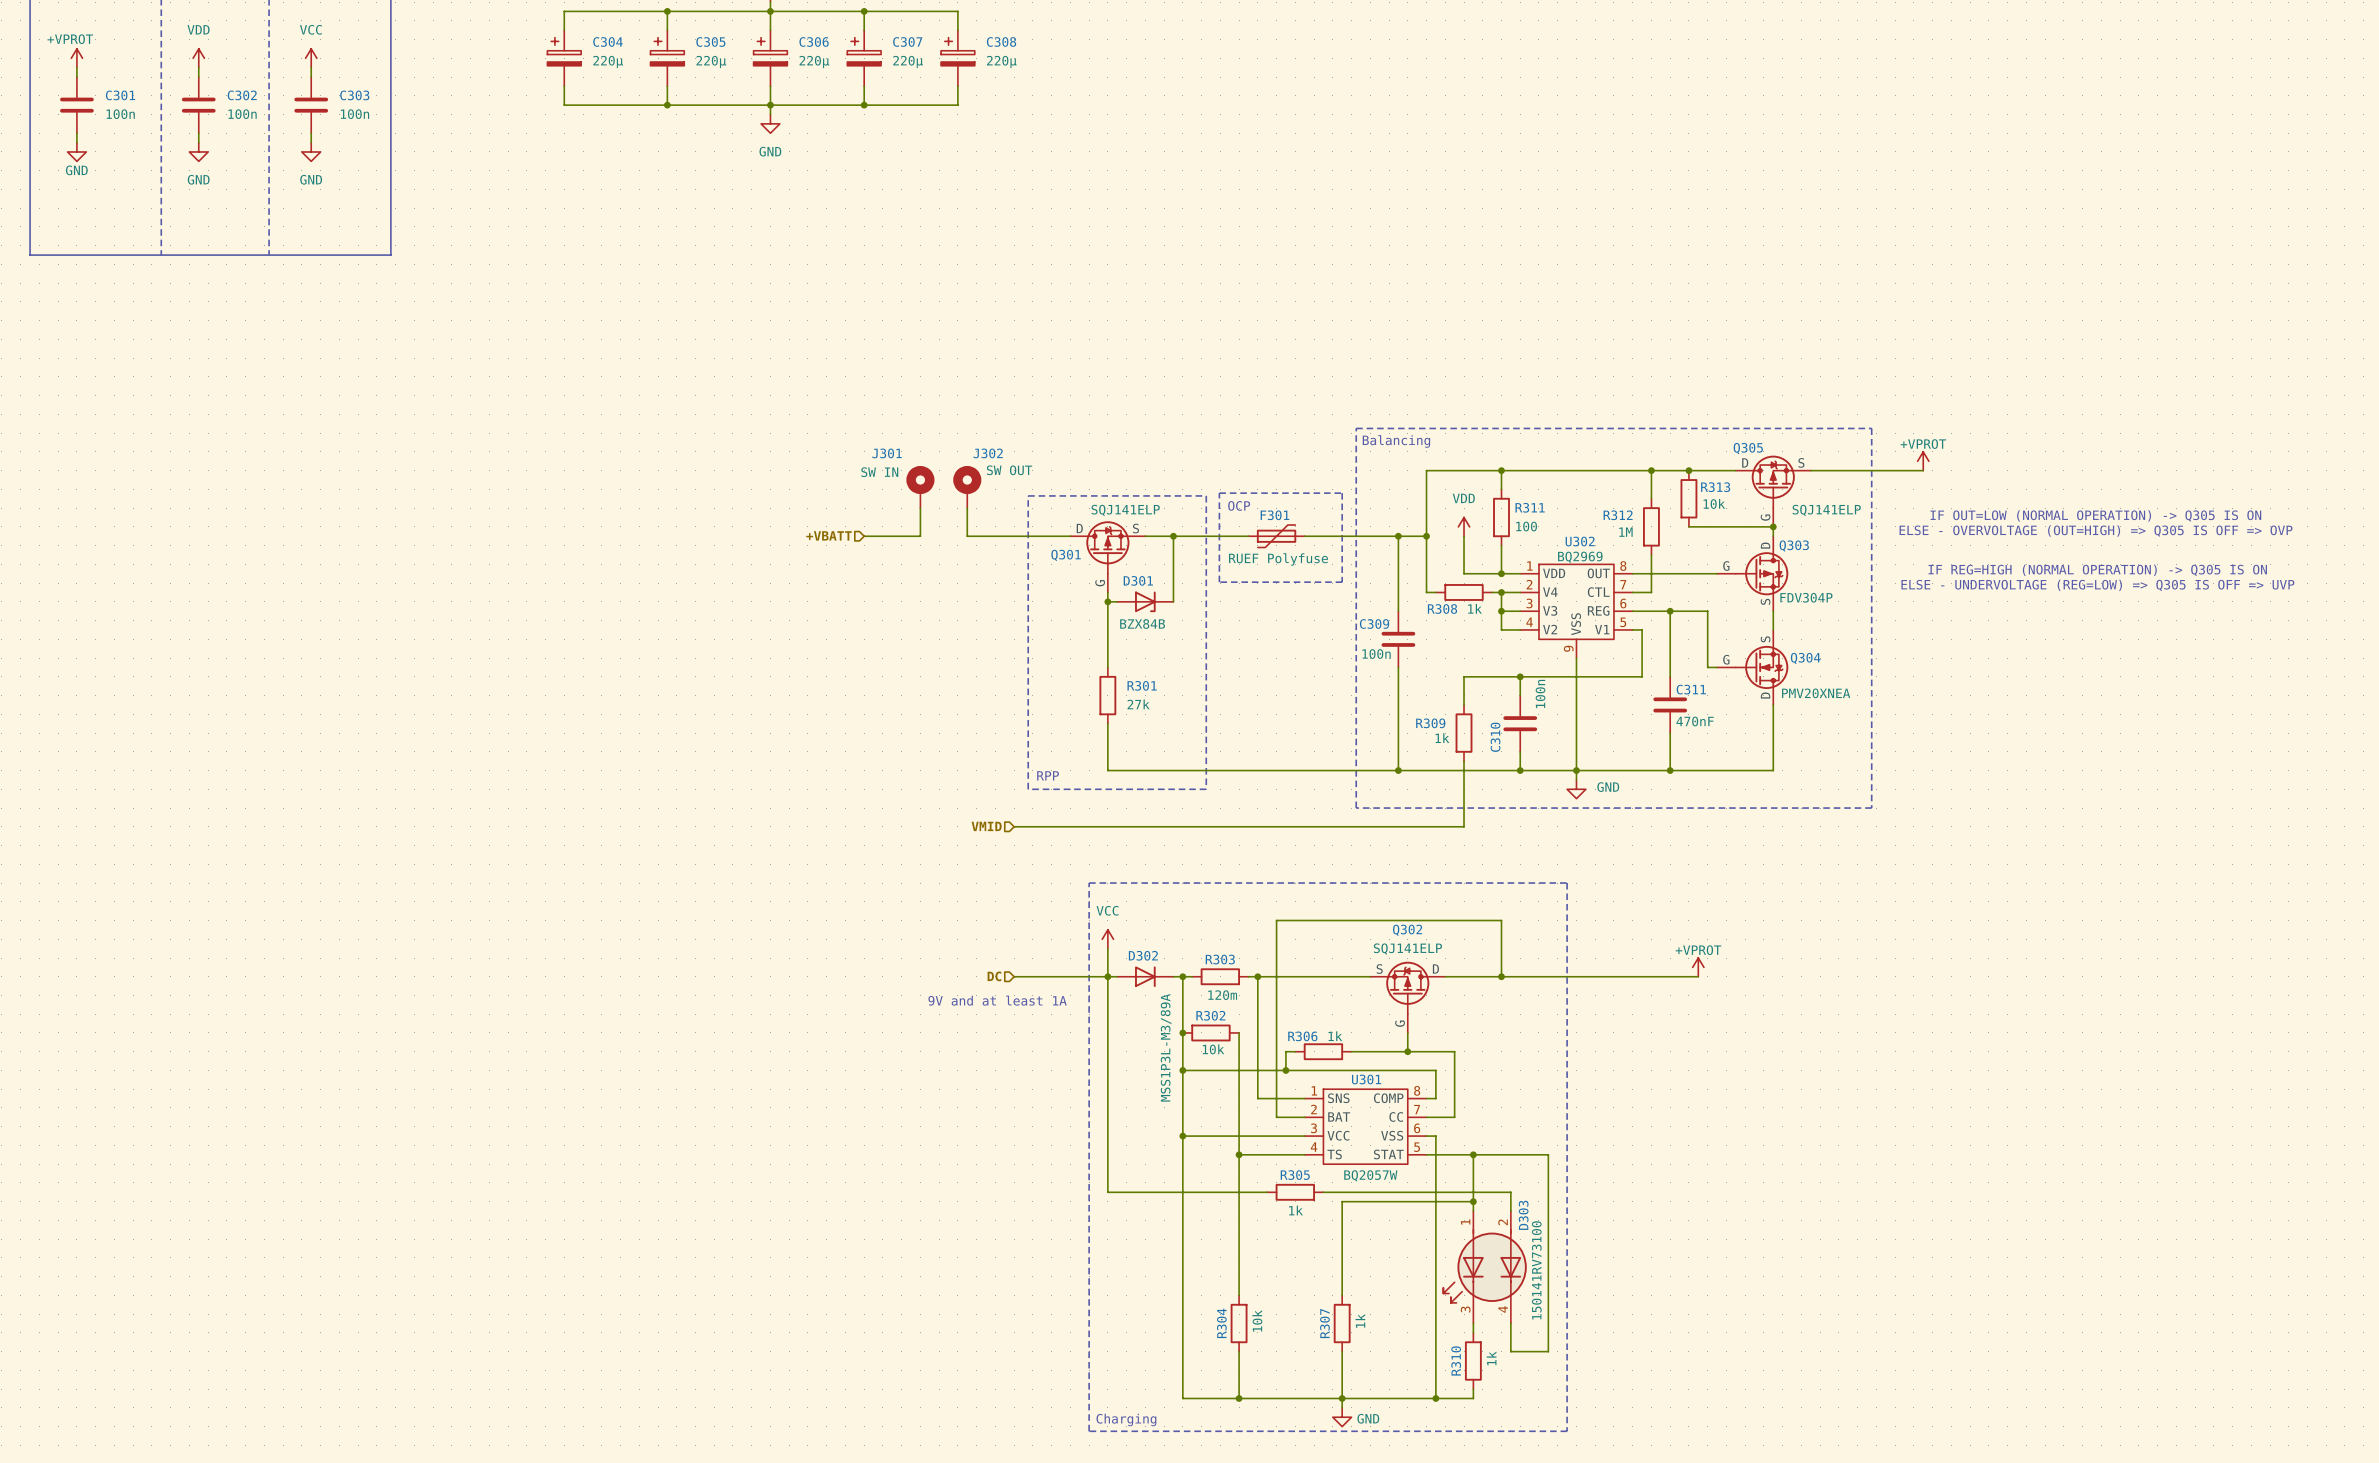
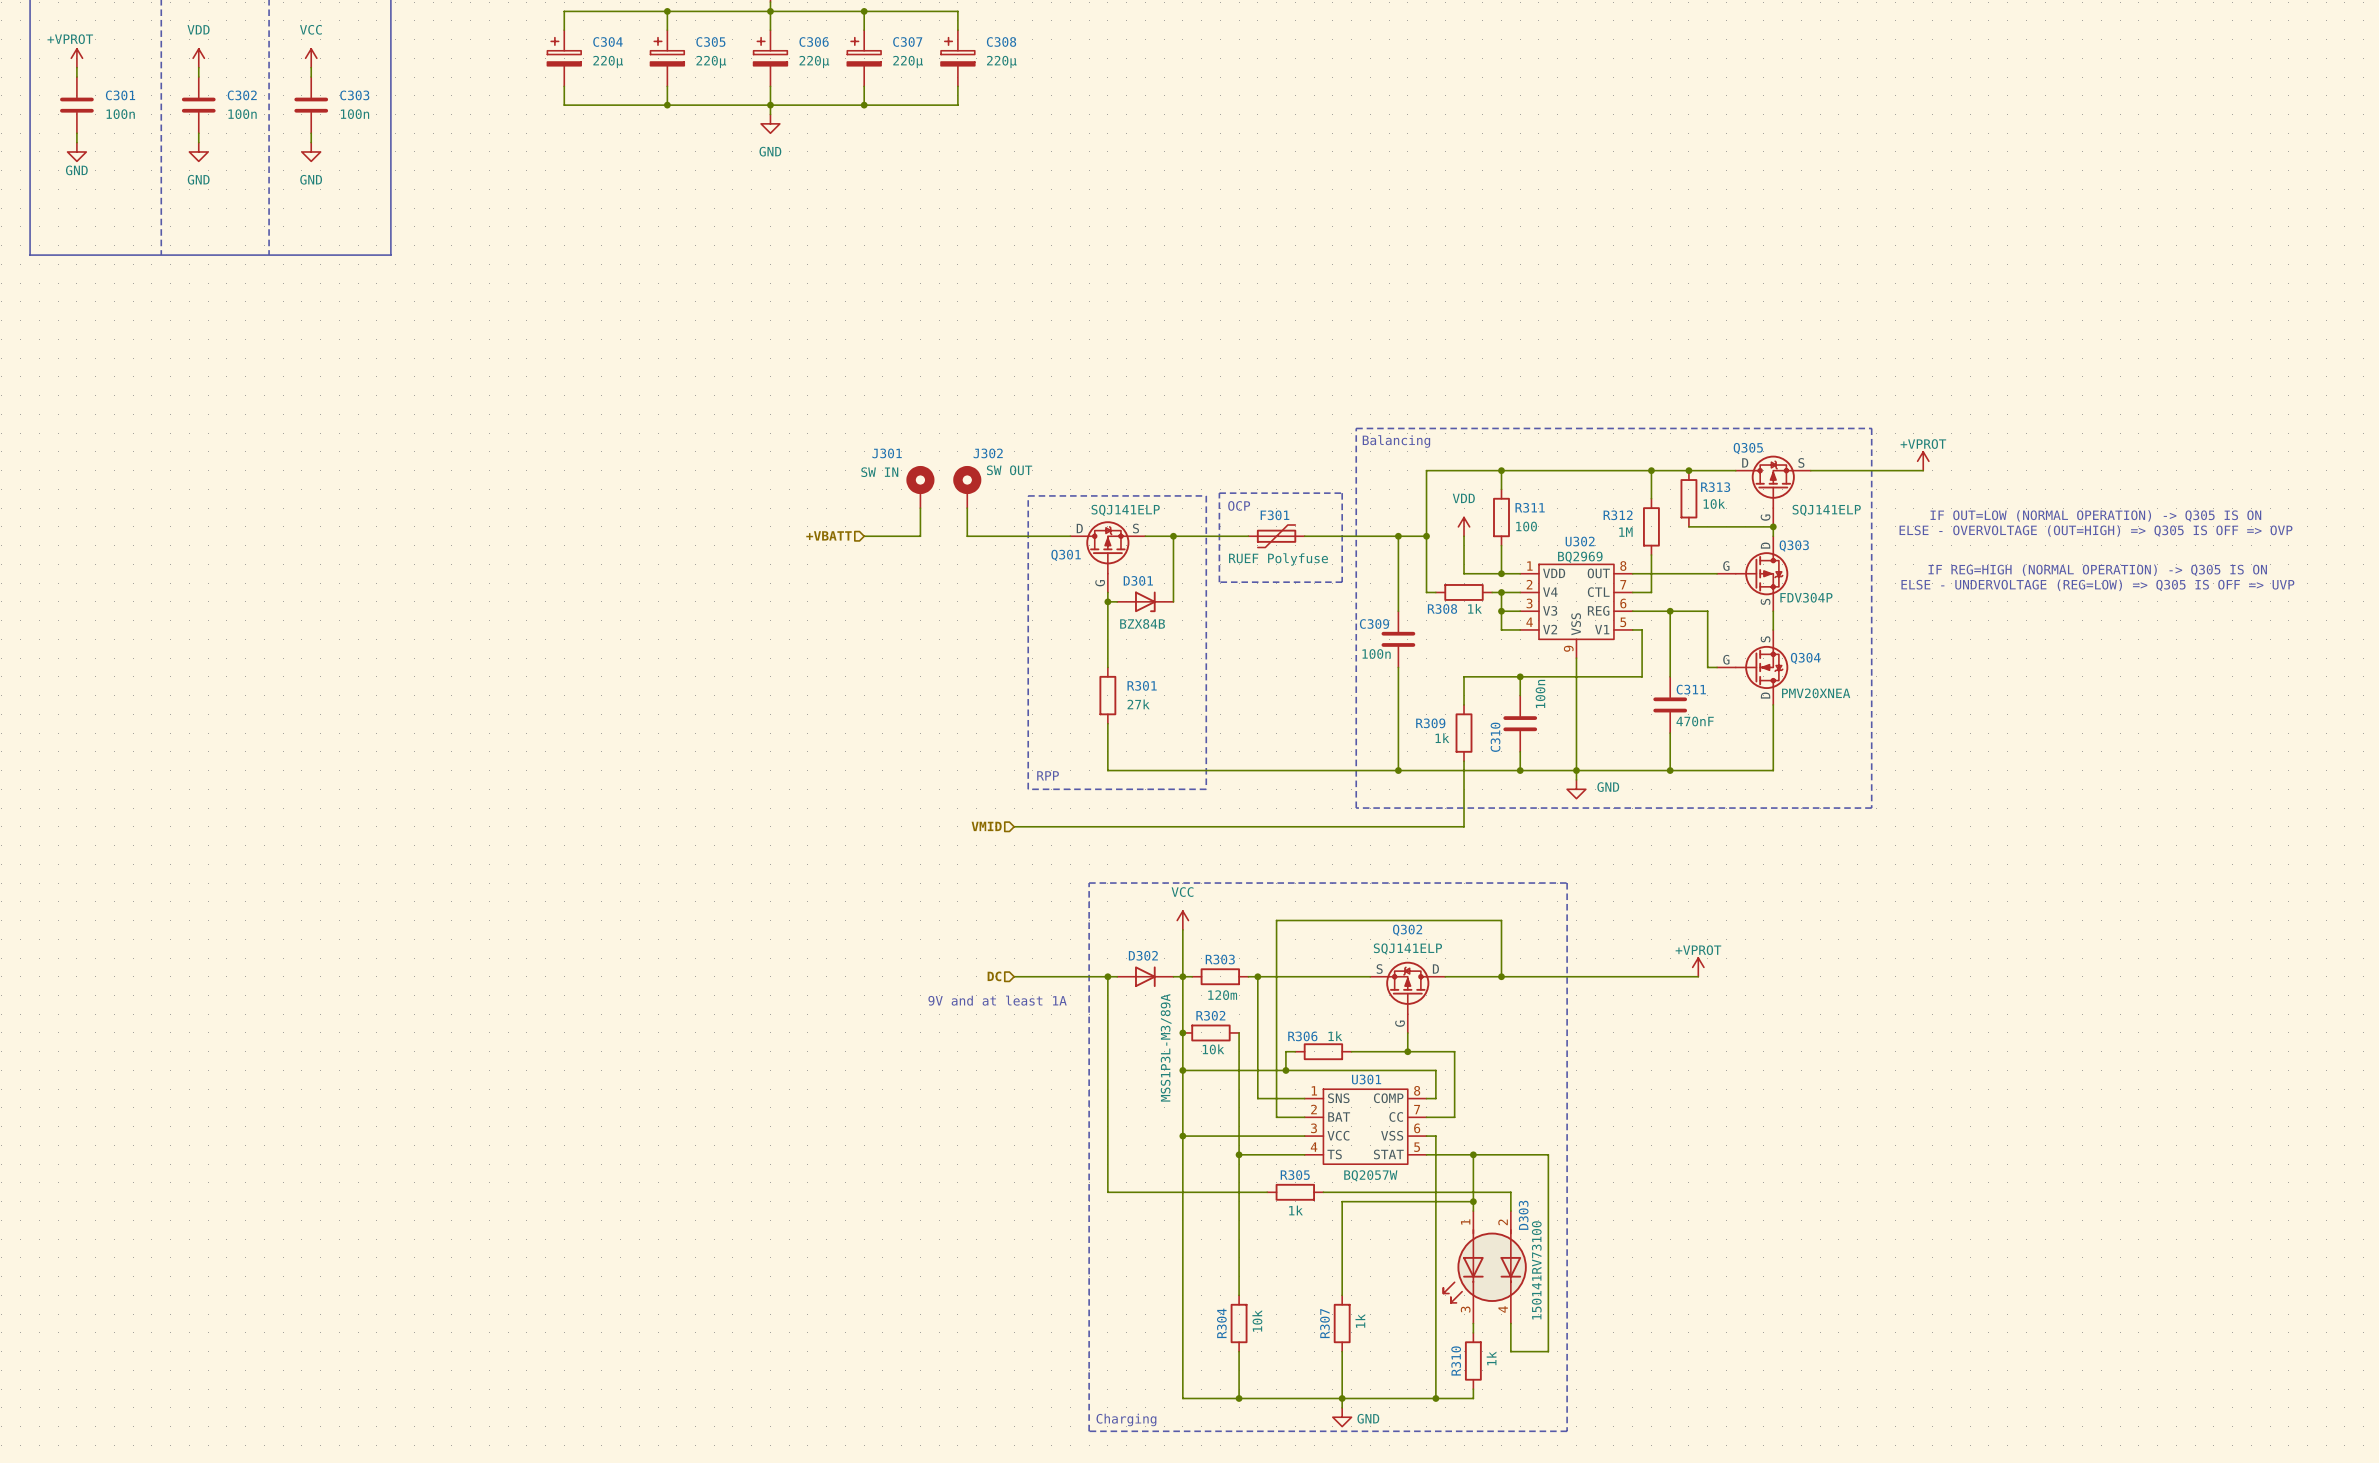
wire: none -> (1182, 929) (1182, 976)
power symbol position: VCC (1107, 939) -> VCC (1182, 920)
wire: (1107, 948) (1107, 976) -> none

